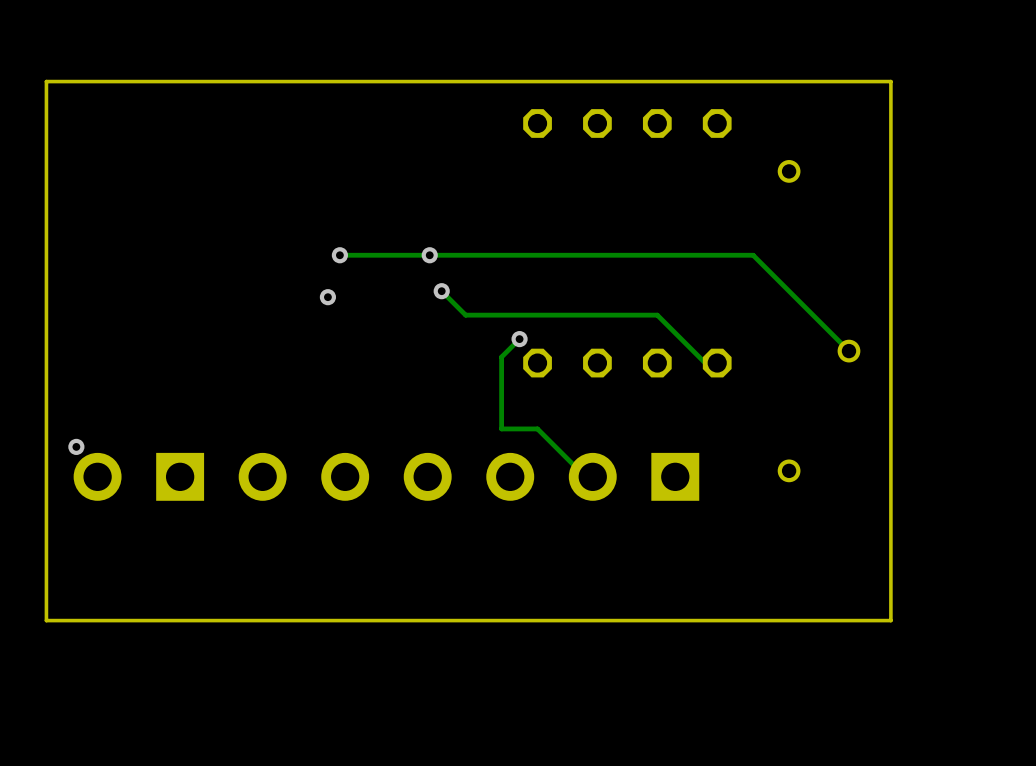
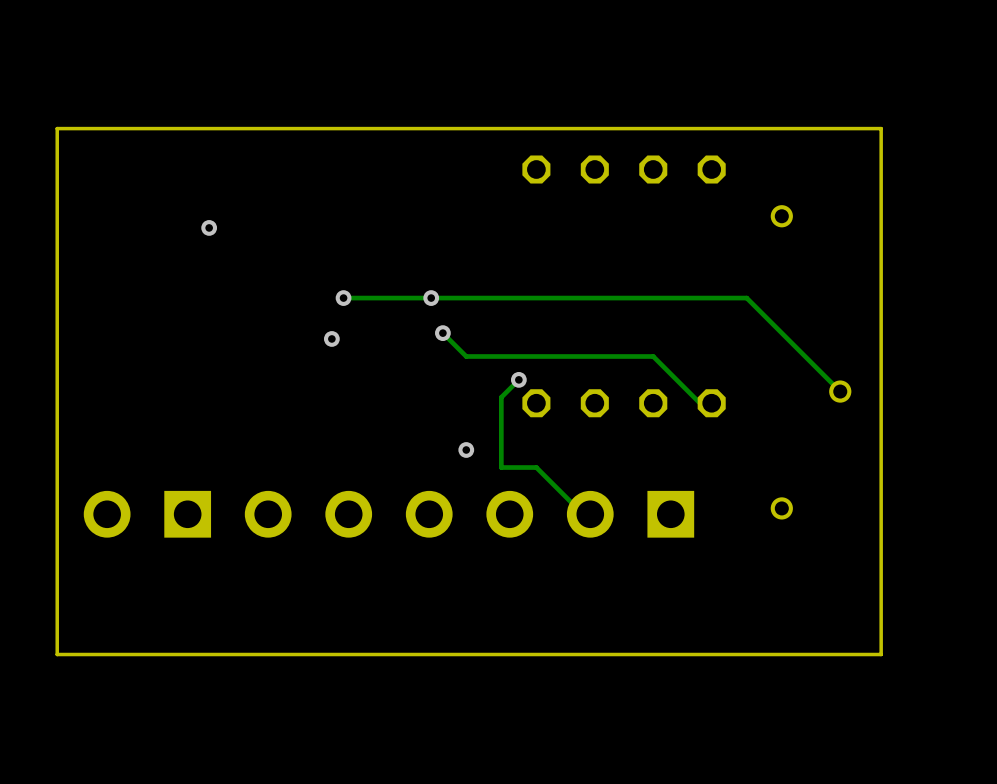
via: none -> (209, 227)
via: none -> (466, 449)
via: (76, 446) -> none

